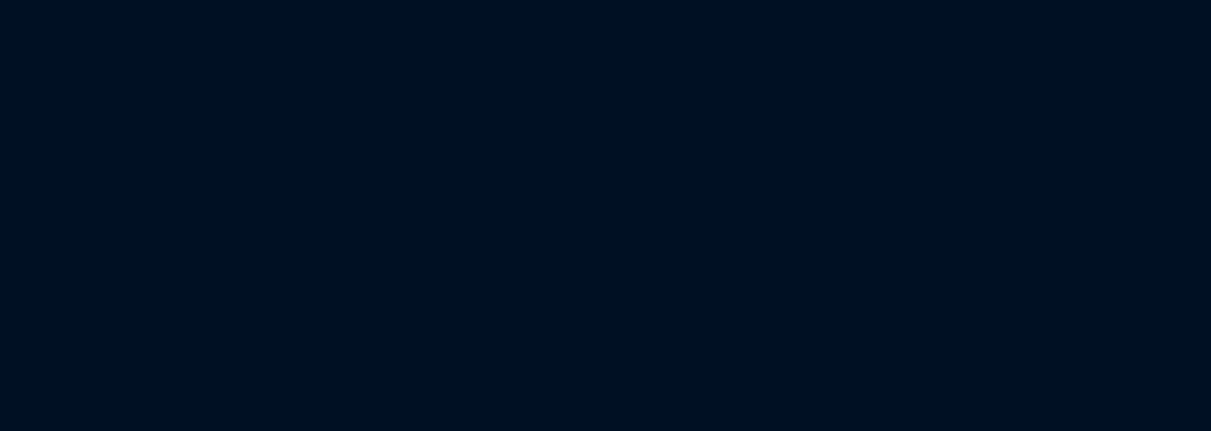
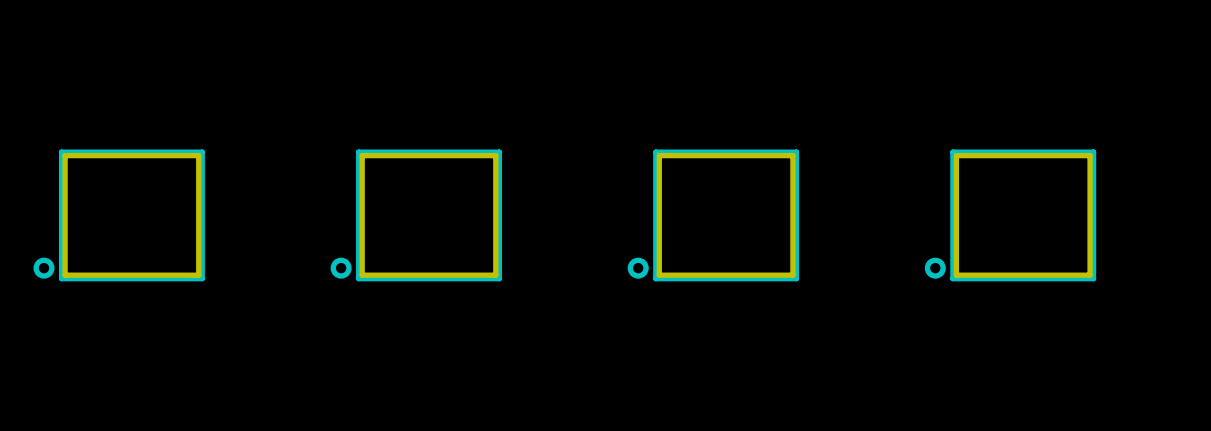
part: none -> (119, 215)
part: none -> (416, 215)
part: none -> (713, 215)
part: none -> (1010, 215)

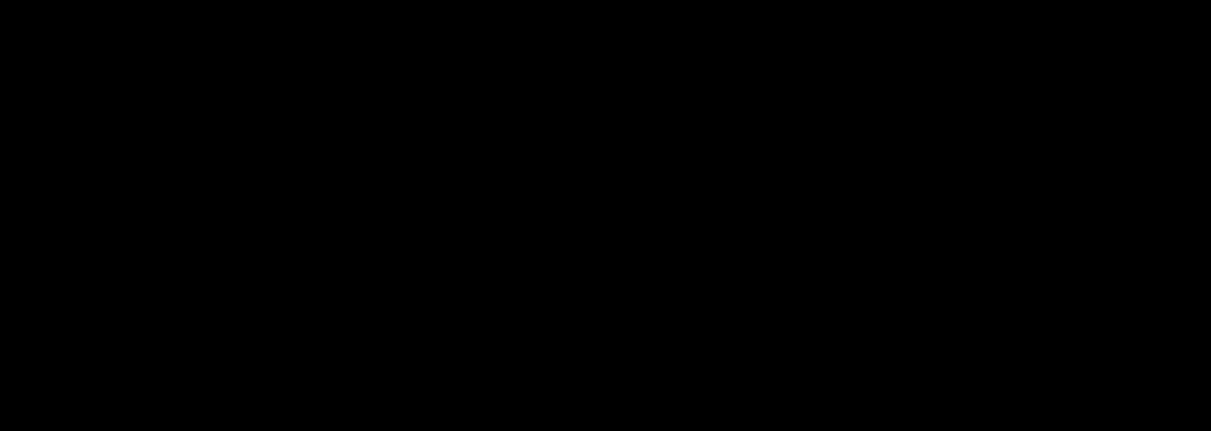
part: (119, 215) -> none
part: (416, 215) -> none
part: (713, 215) -> none
part: (1010, 215) -> none

